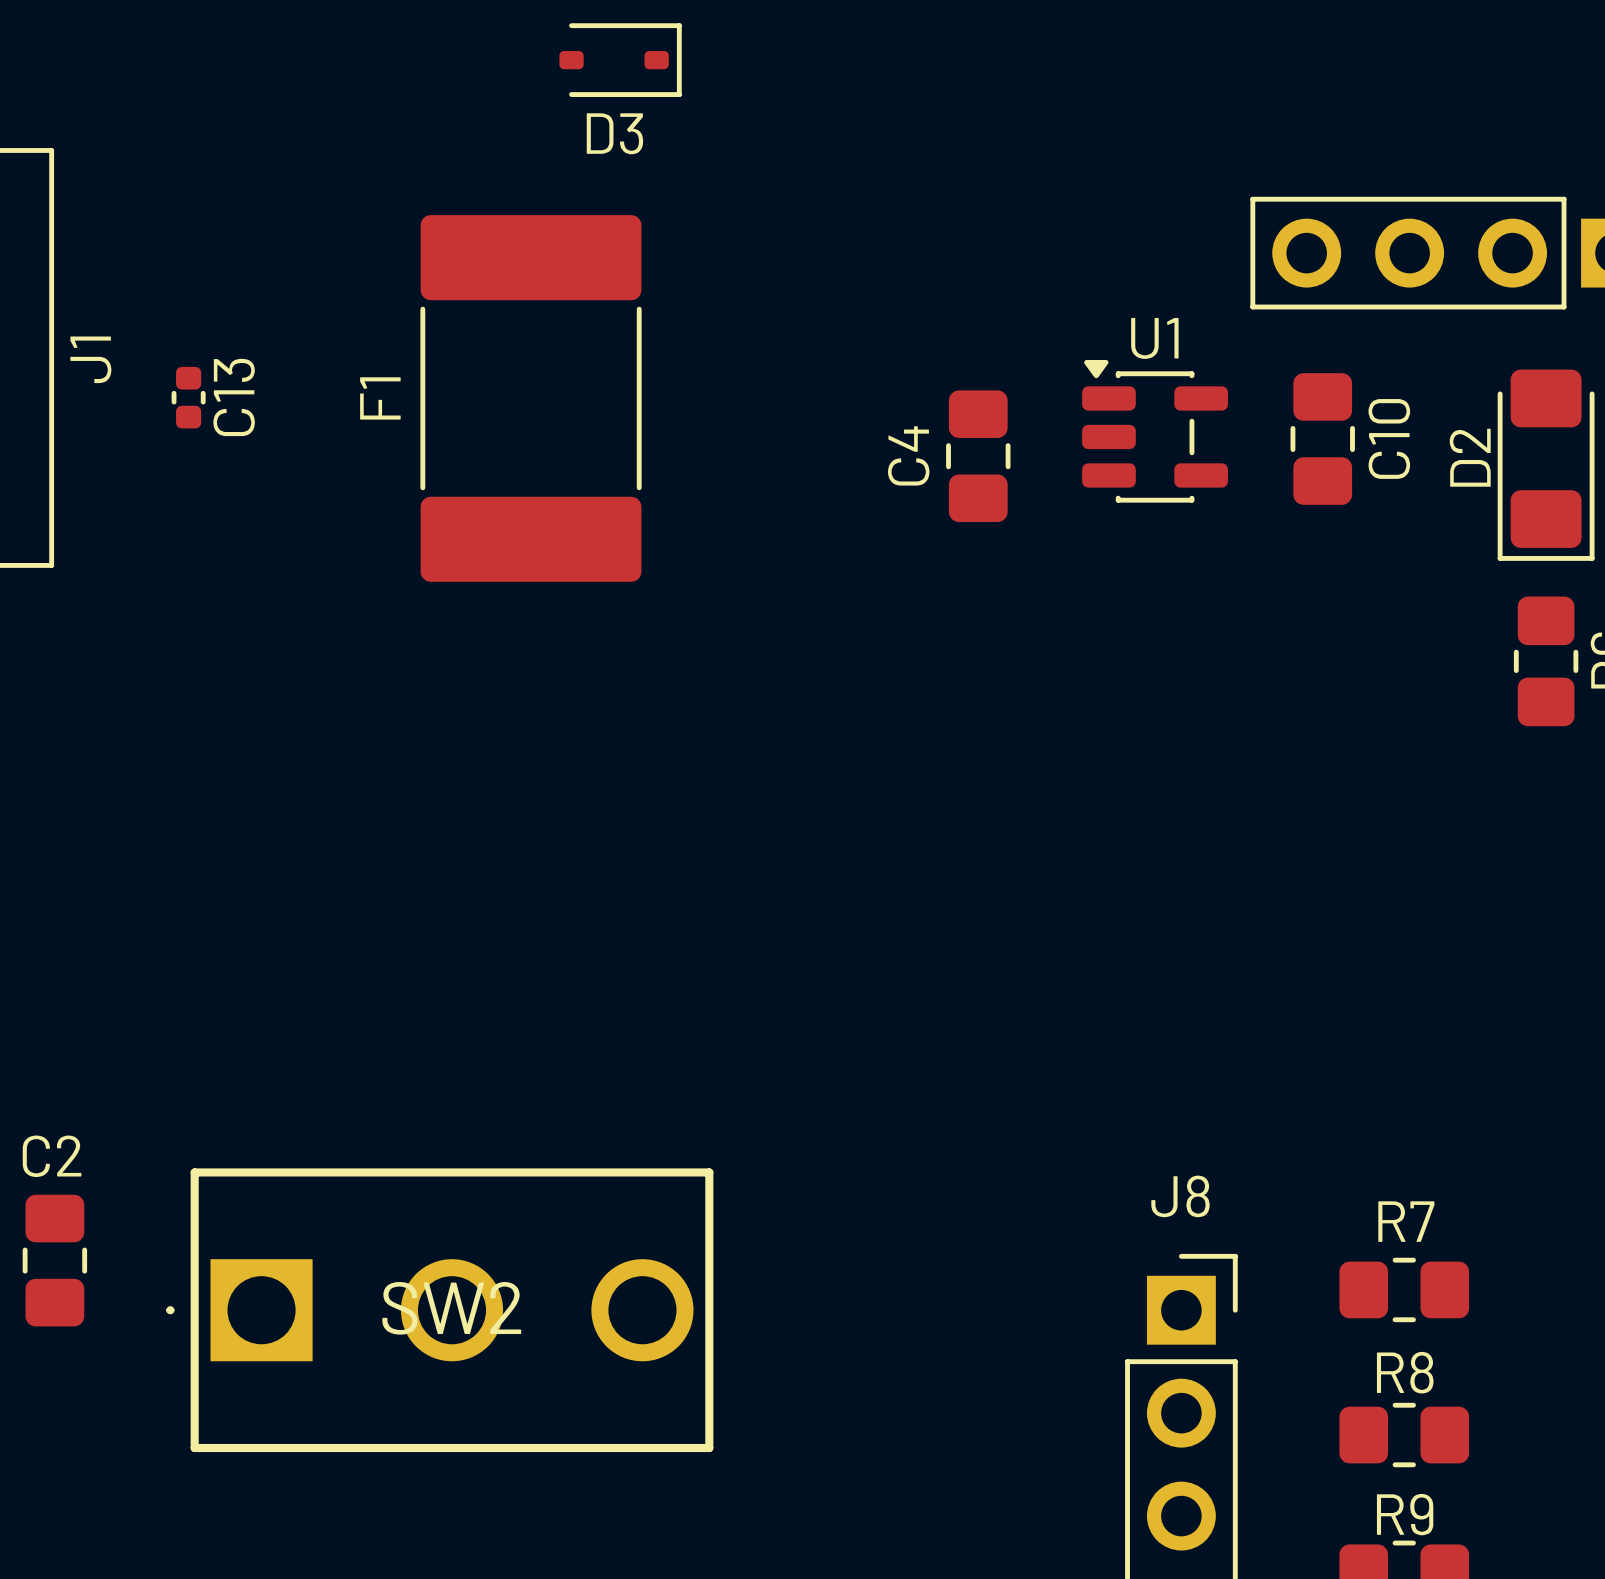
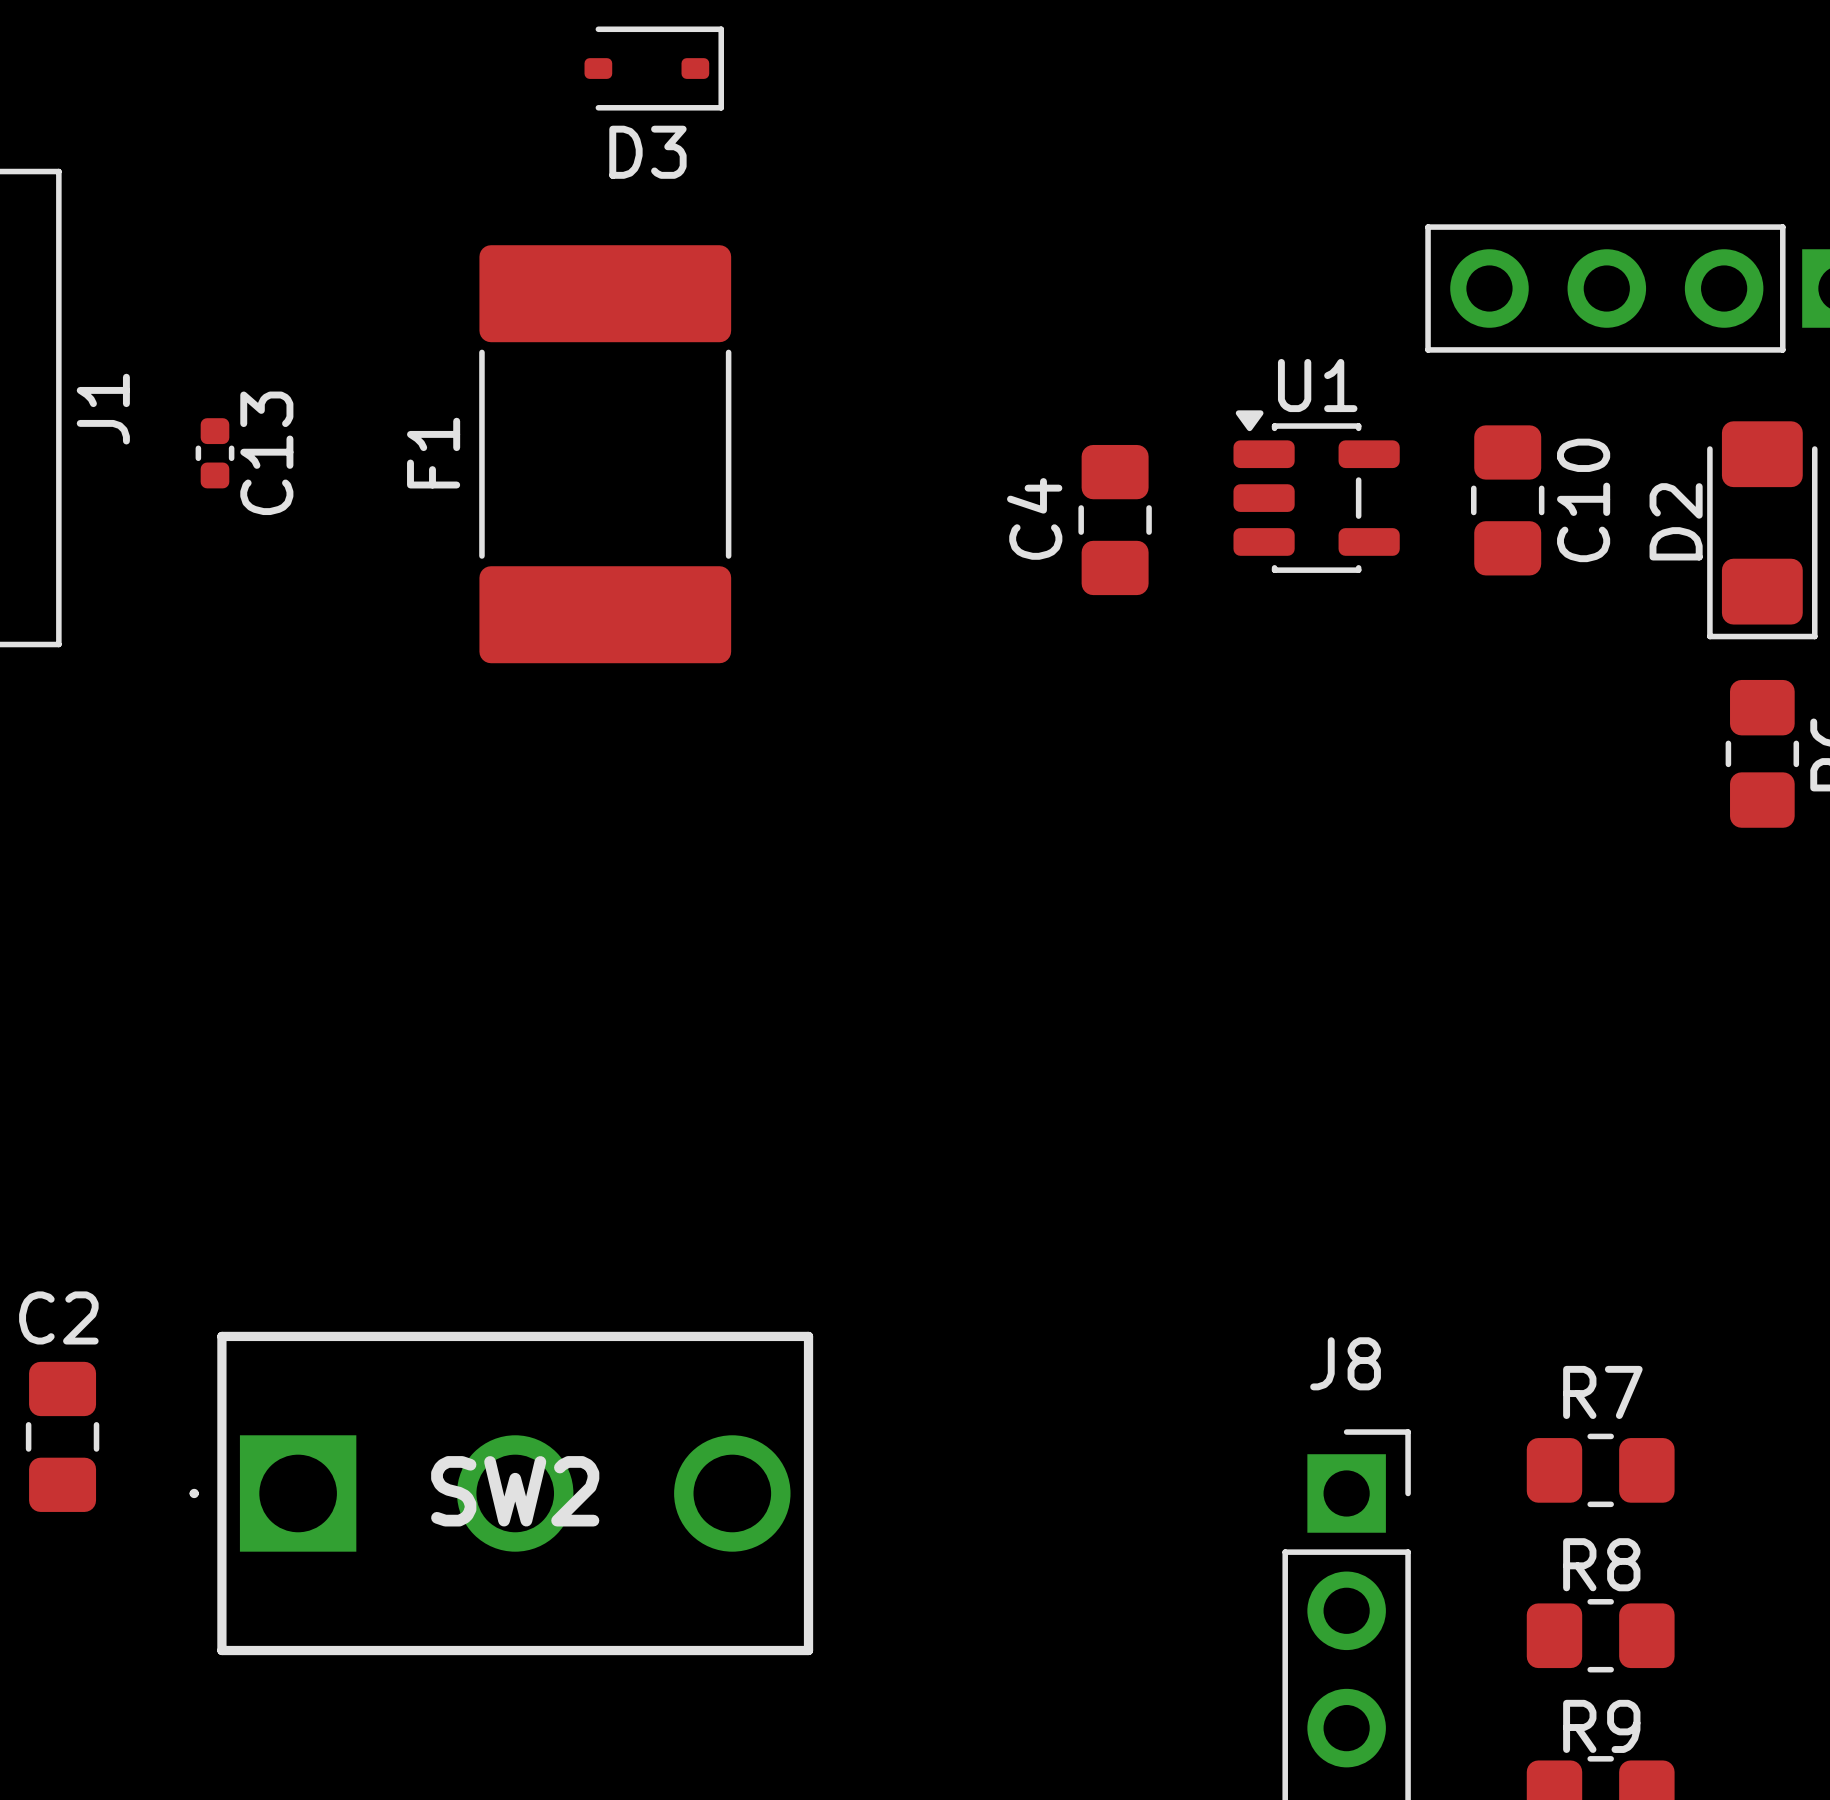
D3 position: (620, 60) -> (654, 68)

